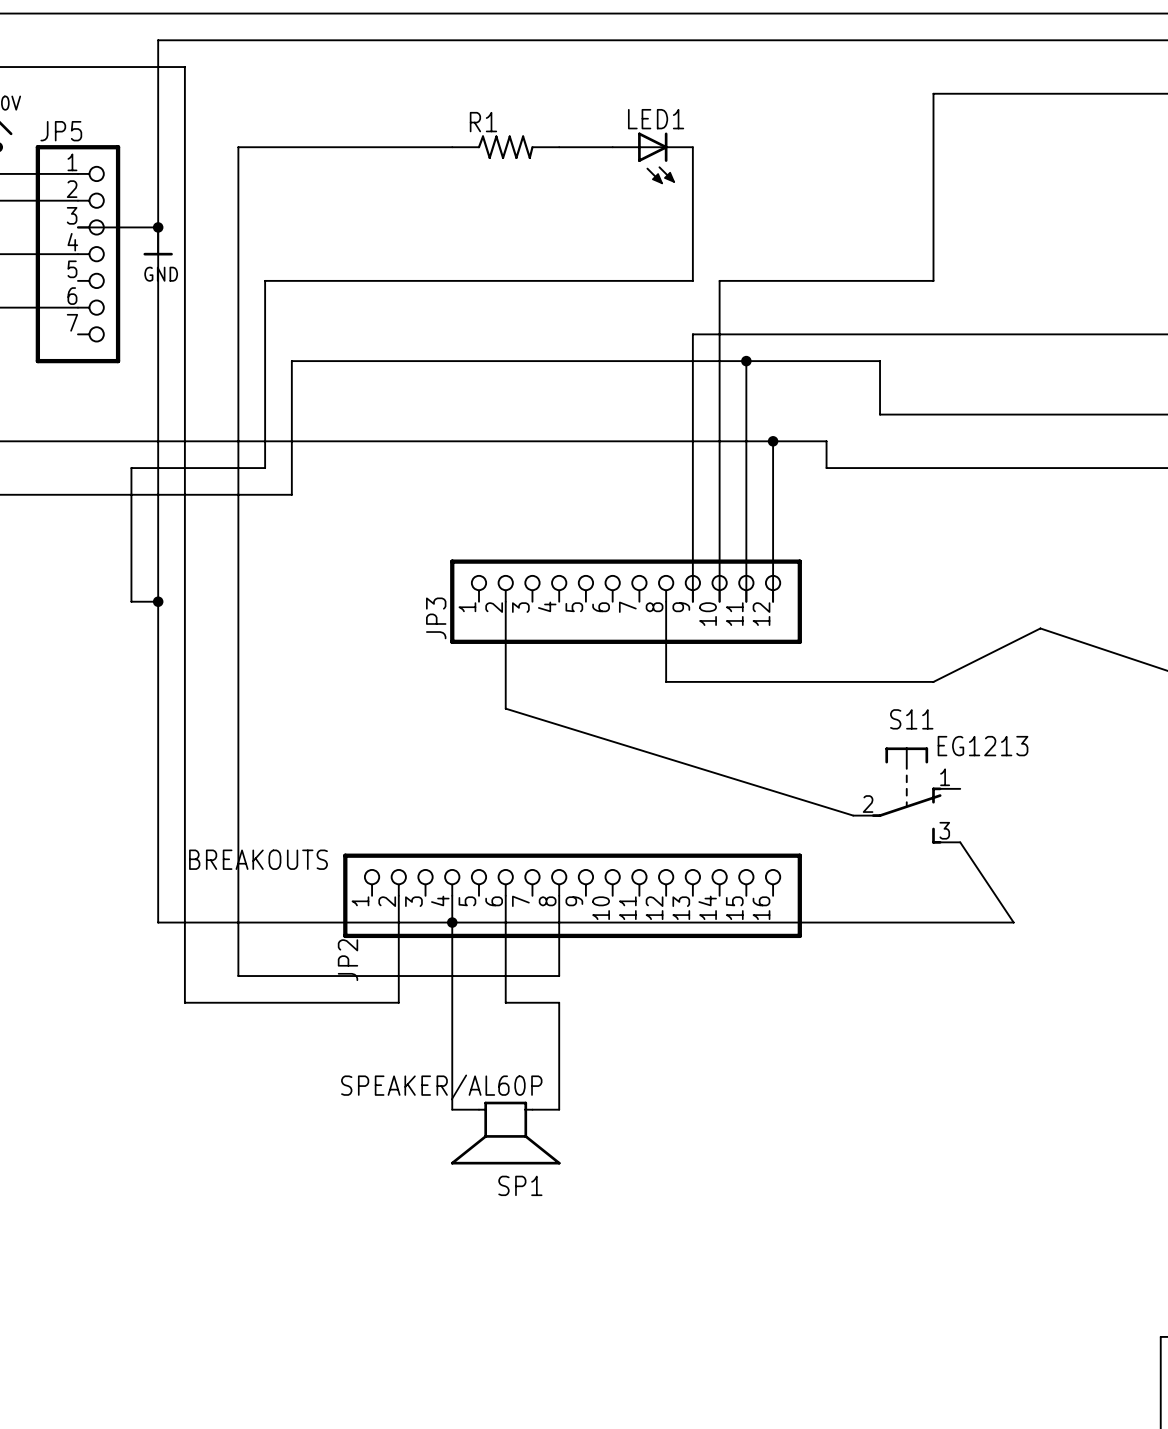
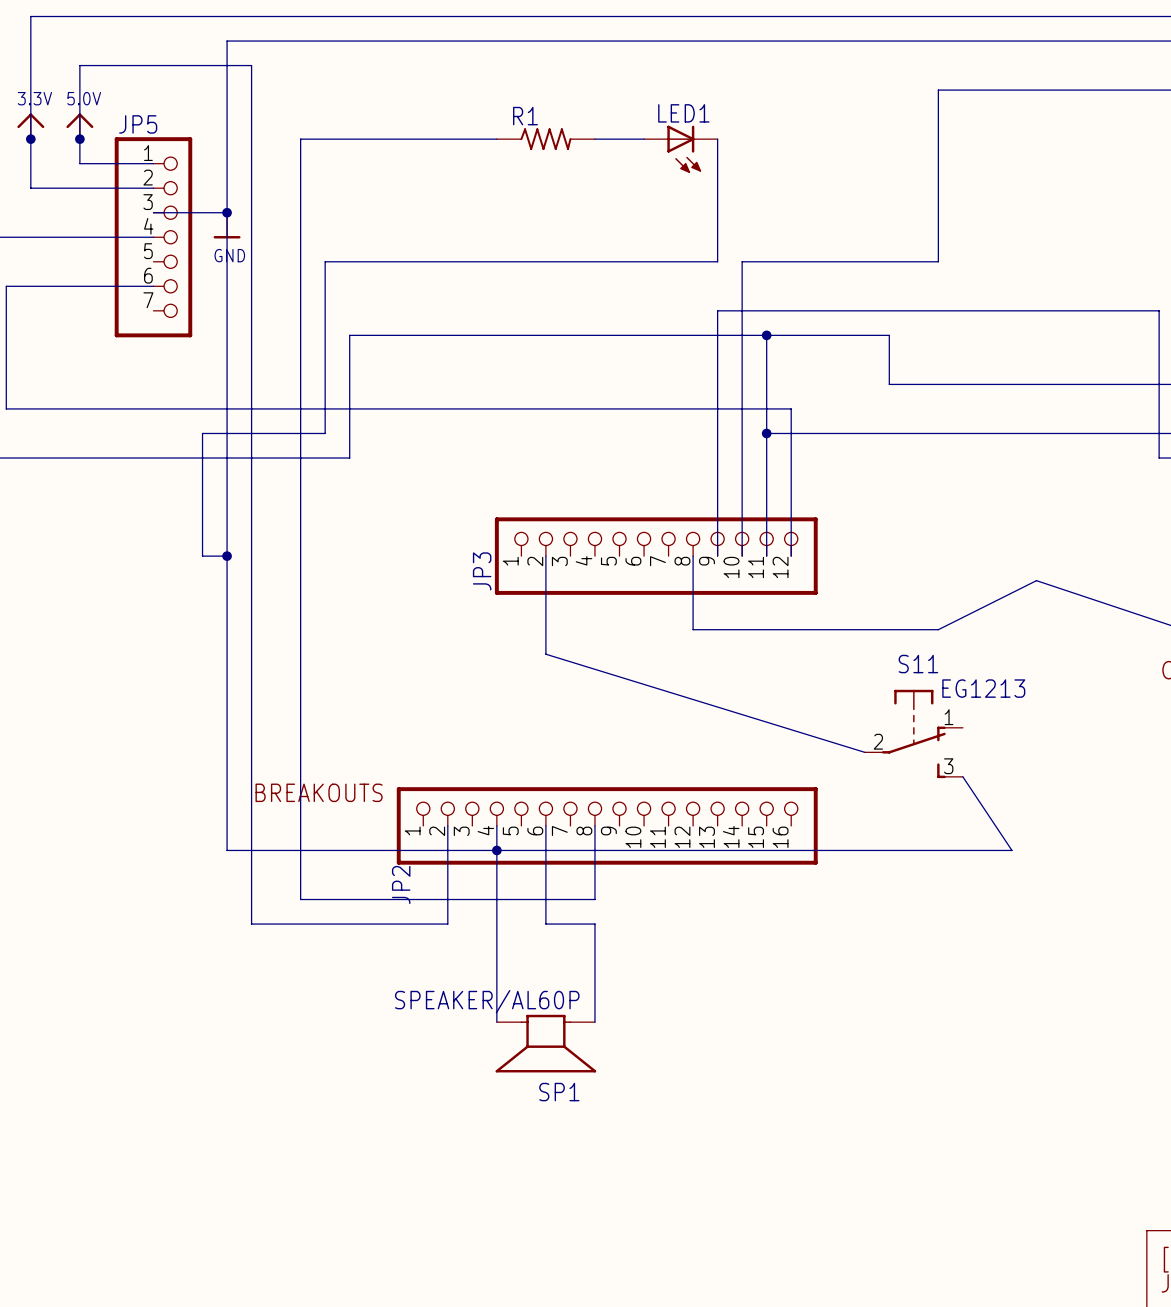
wire: (773, 441) (826, 441) (826, 468) -> (766, 433) (840, 433)
junction position: (773, 441) -> (766, 433)

